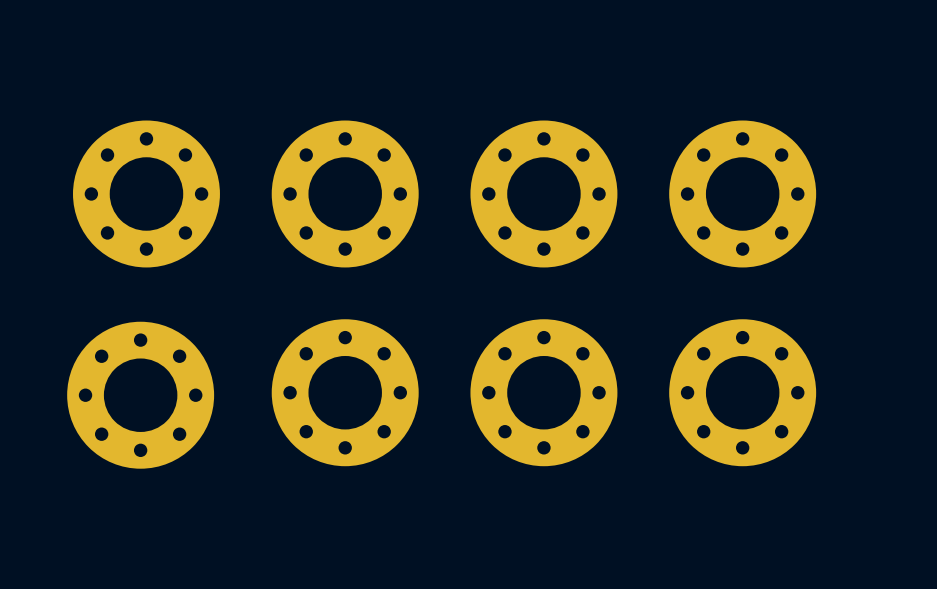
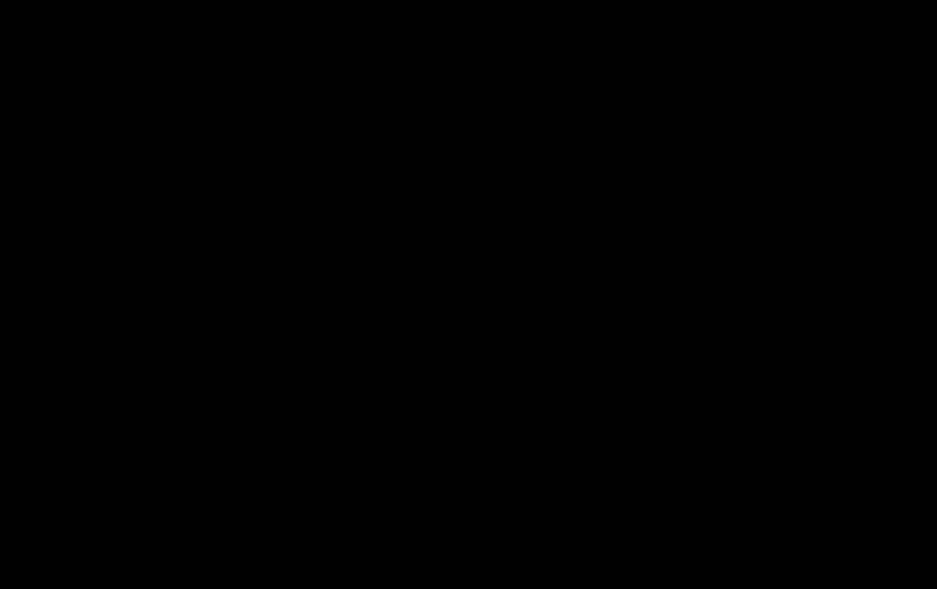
part: (146, 193) -> none
part: (345, 193) -> none
part: (543, 193) -> none
part: (742, 193) -> none
part: (345, 392) -> none
part: (543, 392) -> none
part: (742, 392) -> none
part: (140, 395) -> none

